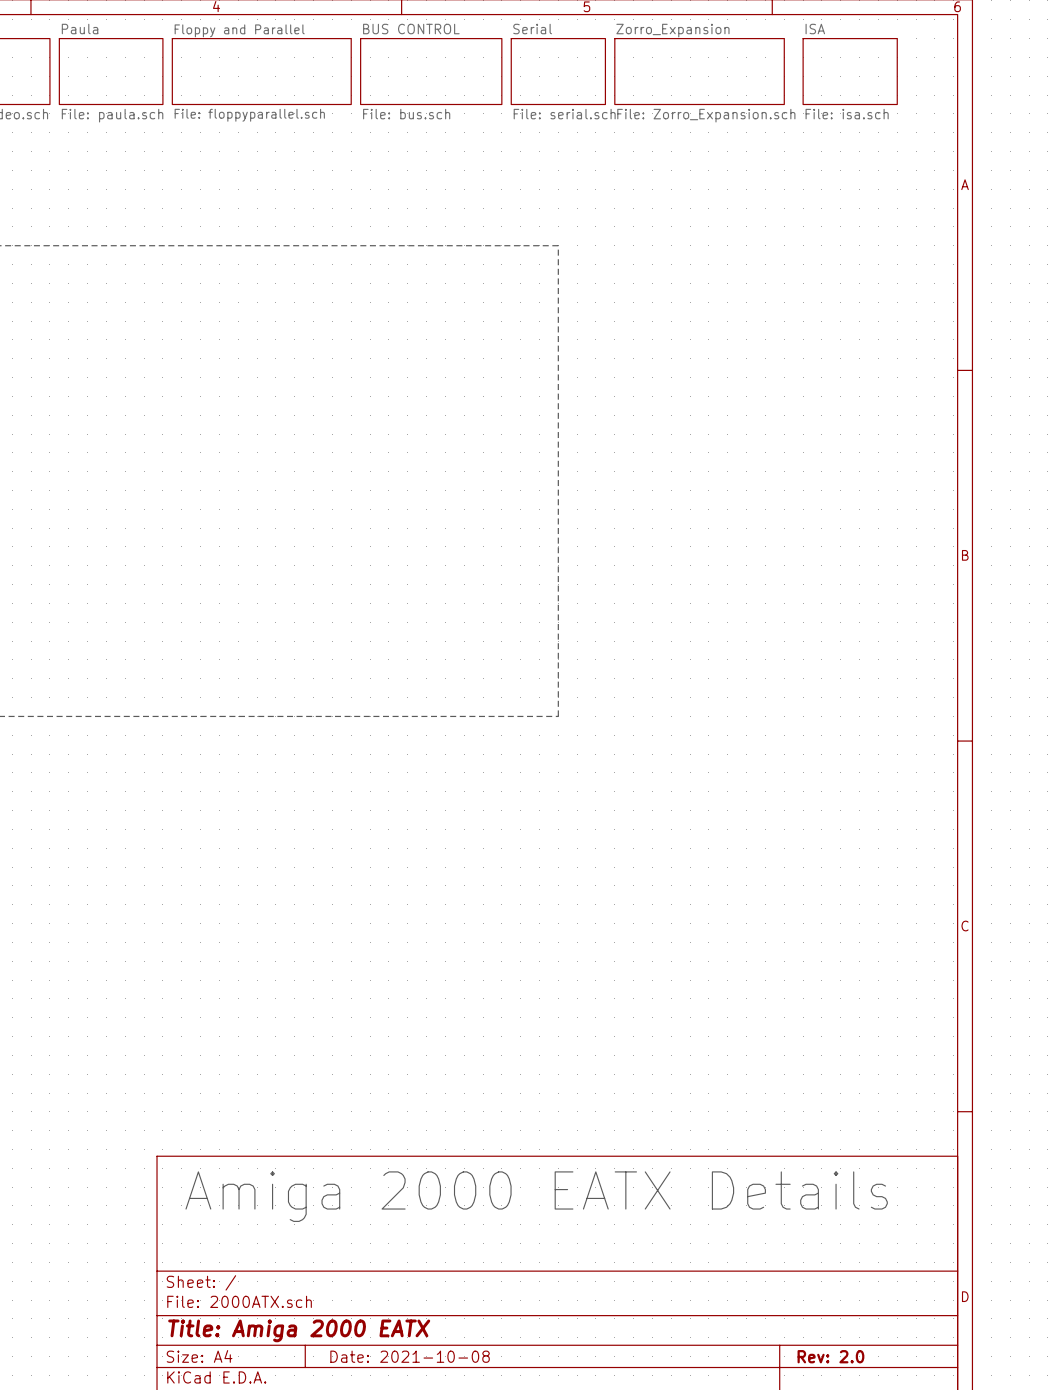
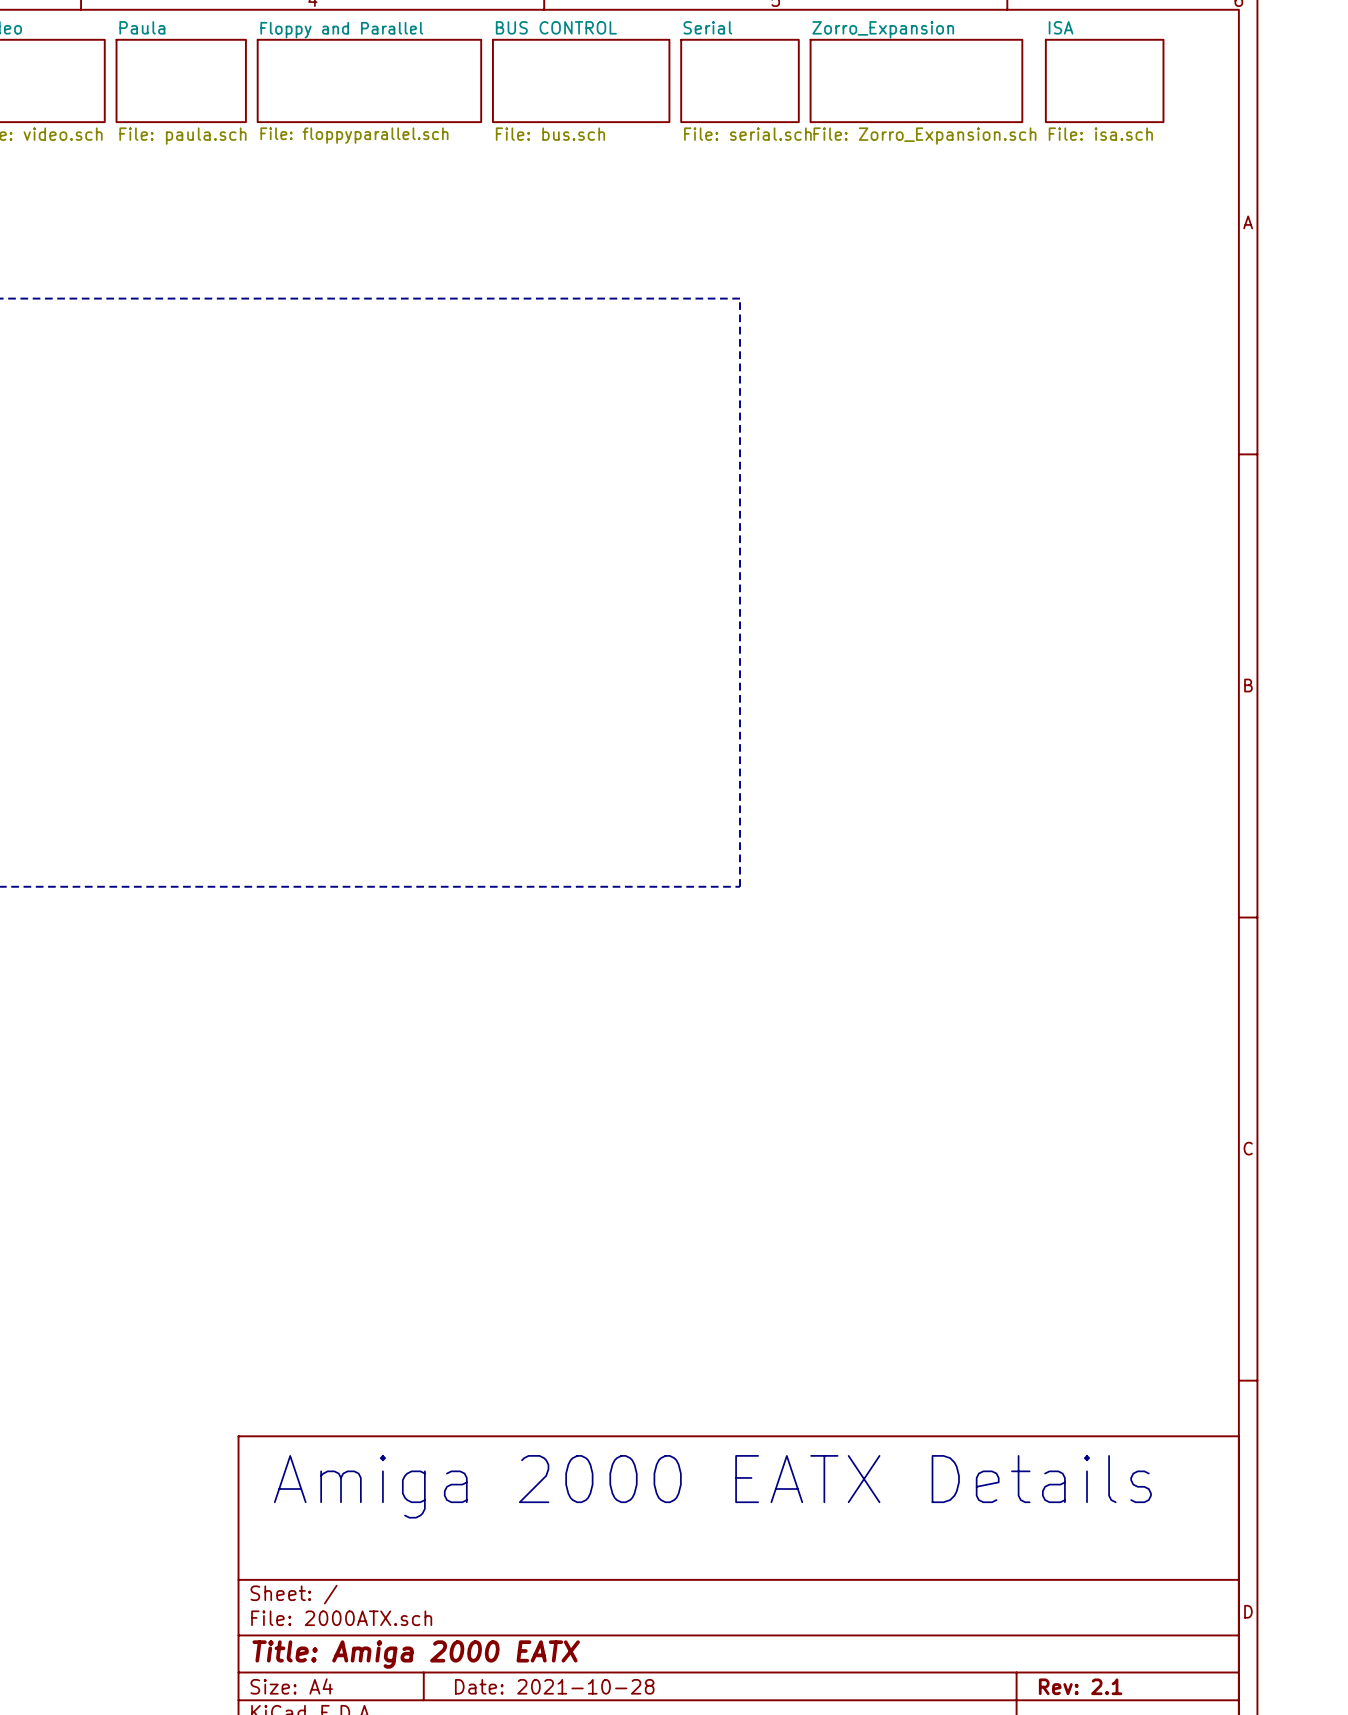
title block: Date: 2021-10-08 (410, 1356) -> Date: 2021-10-28 (554, 1686)
title block: Rev: 2.0 (830, 1356) -> Rev: 2.1 (1080, 1686)

